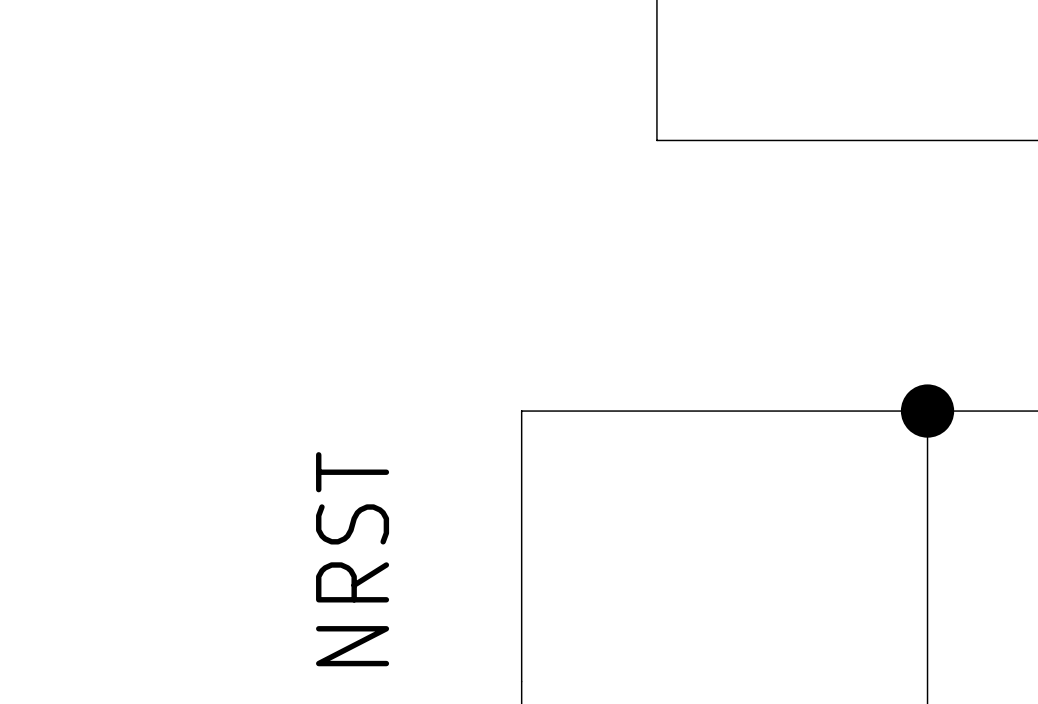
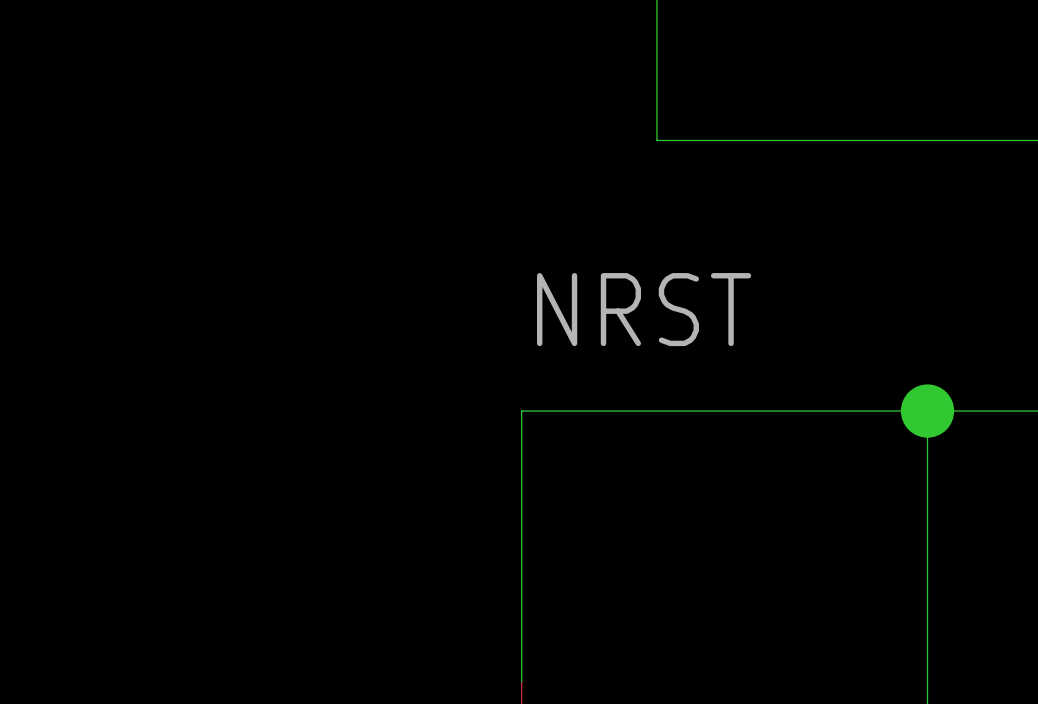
label rotation: 0° (352, 559) -> 90° clockwise (644, 309)
label position: NRST (352, 559) -> NRST (644, 309)

